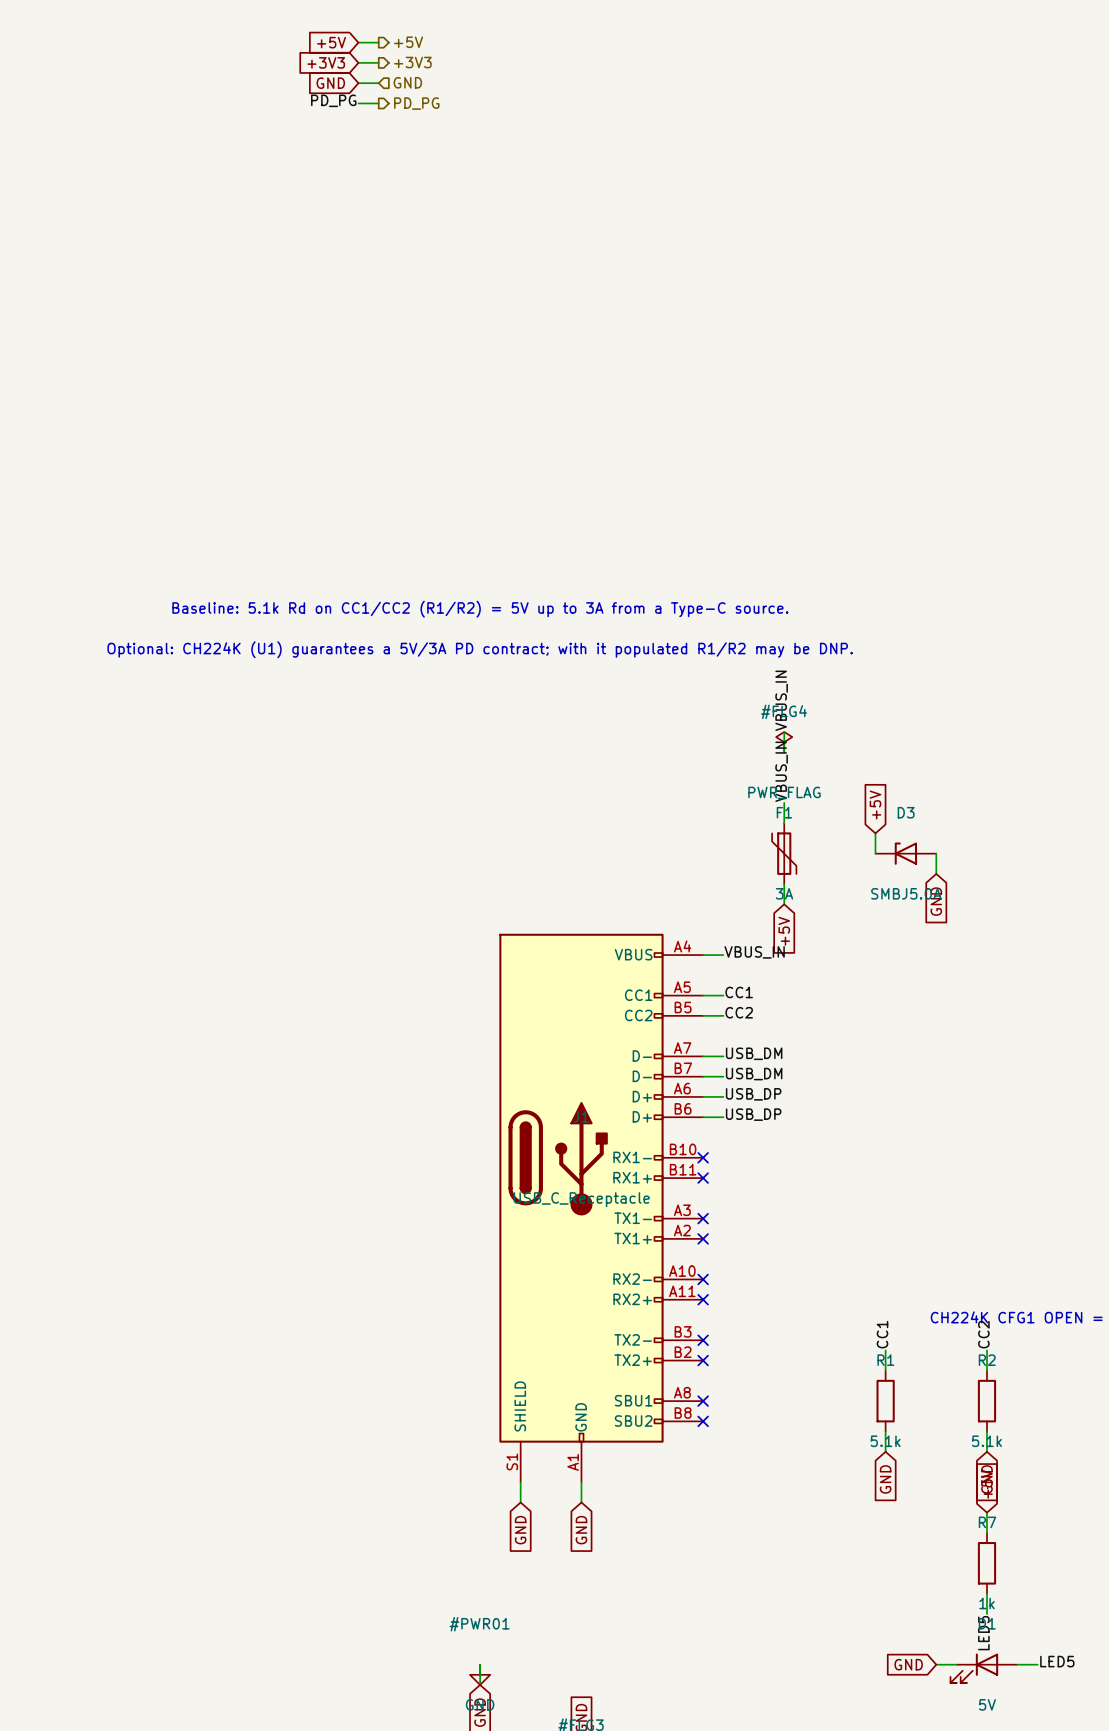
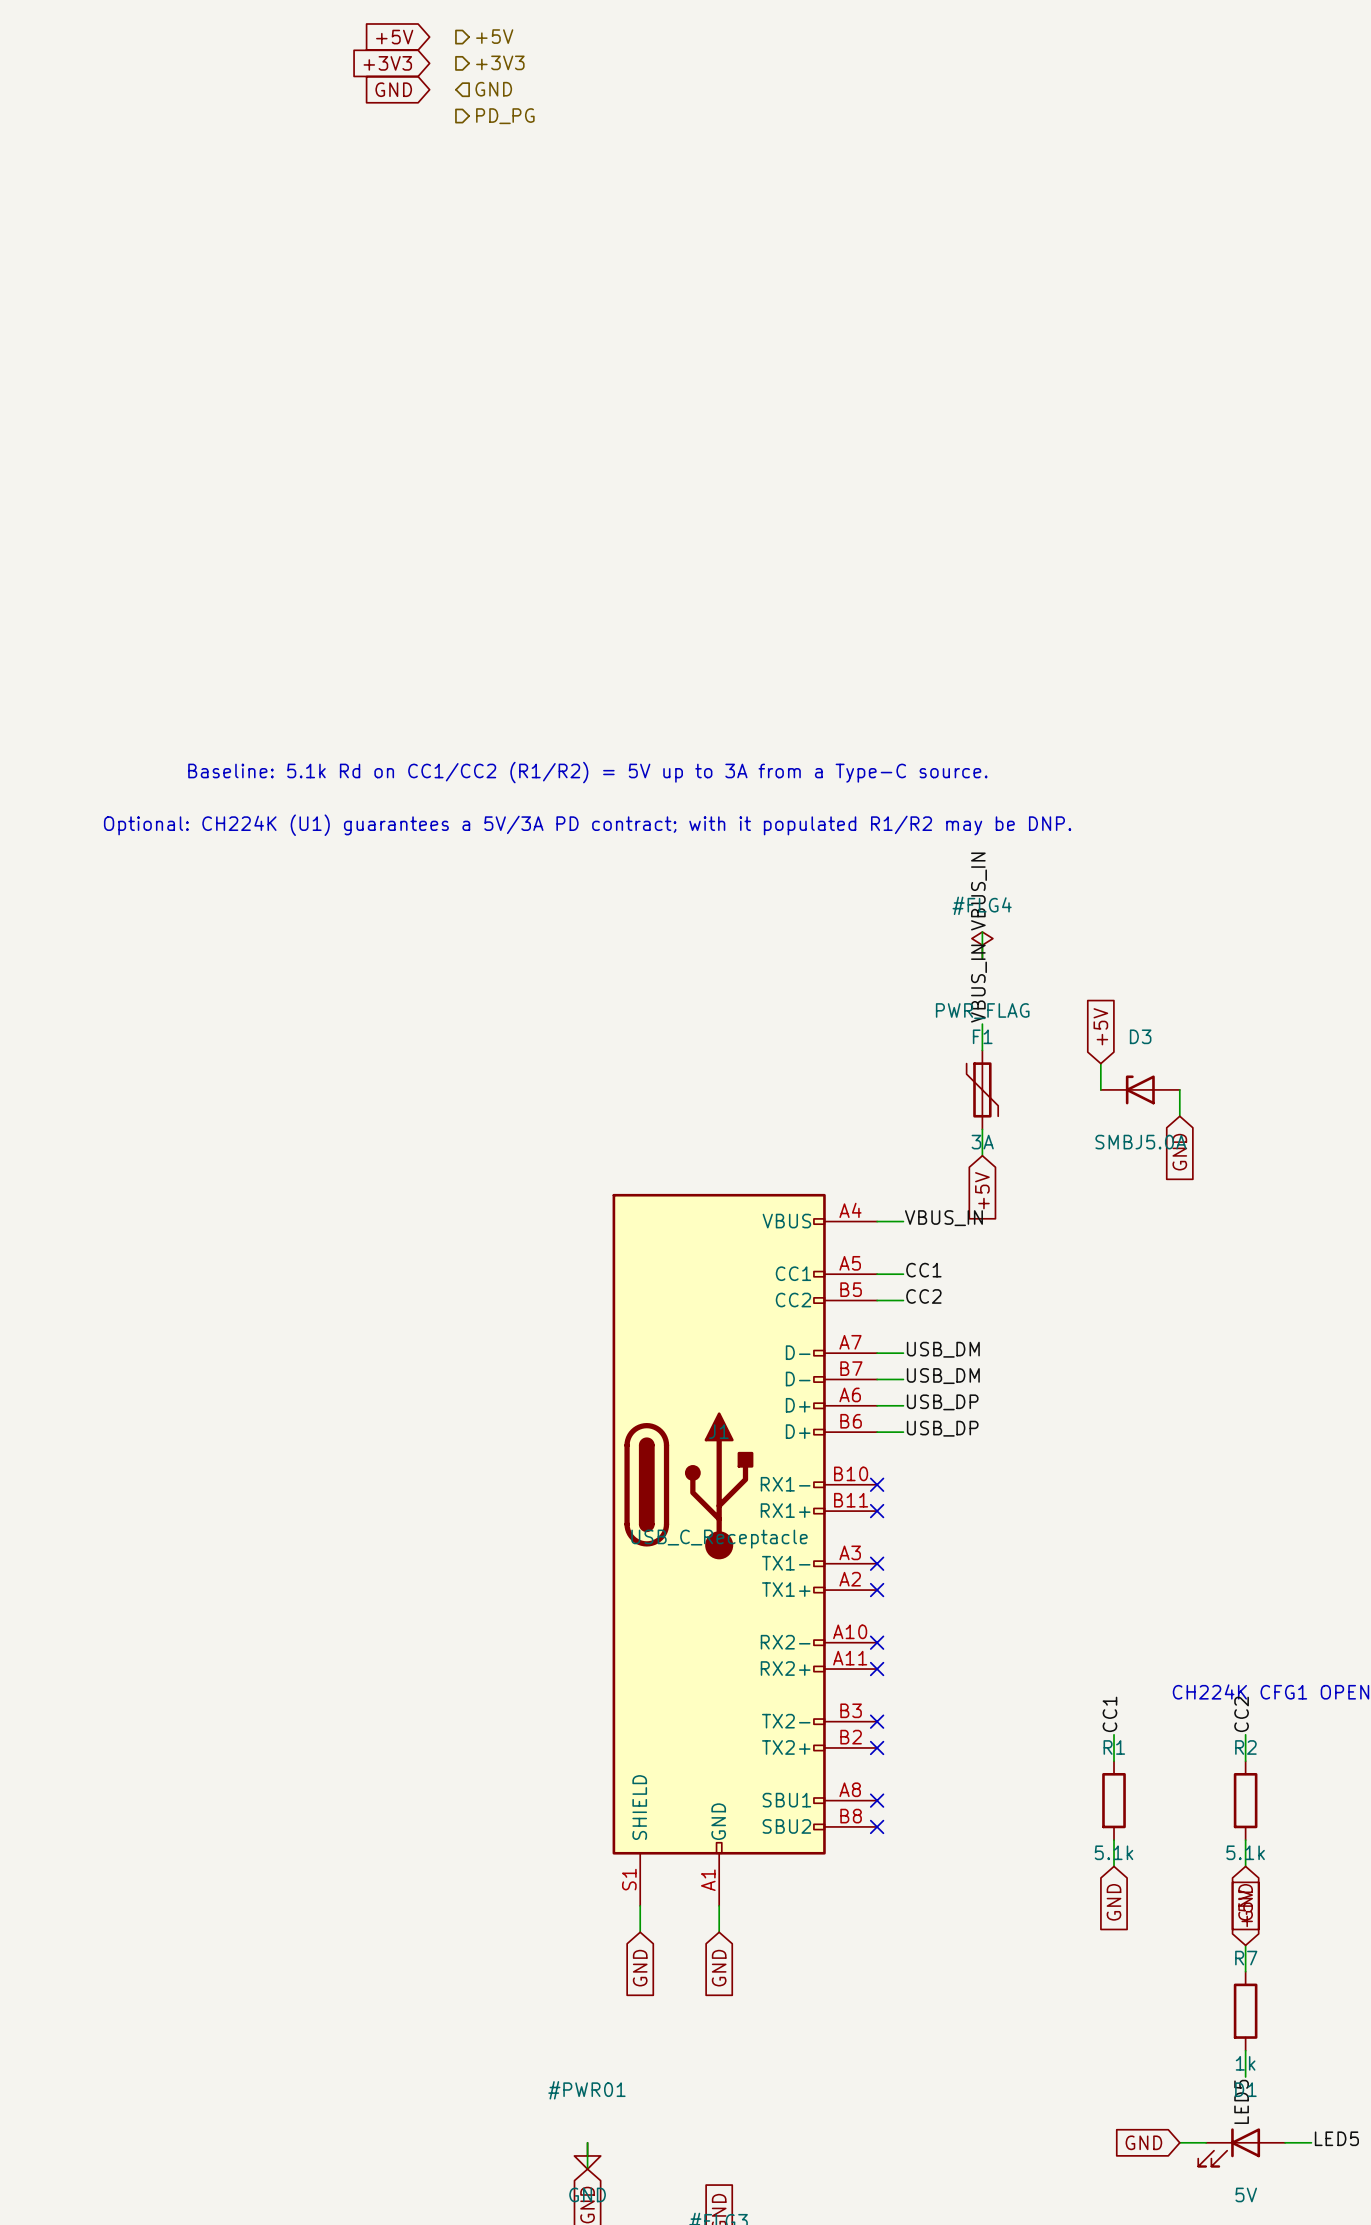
wire: (358, 42) (378, 42) -> none
wire: (358, 62) (378, 62) -> none
wire: (358, 83) (378, 83) -> none
label: PD_PG (333, 100) -> none
wire: (358, 103) (378, 103) -> none

